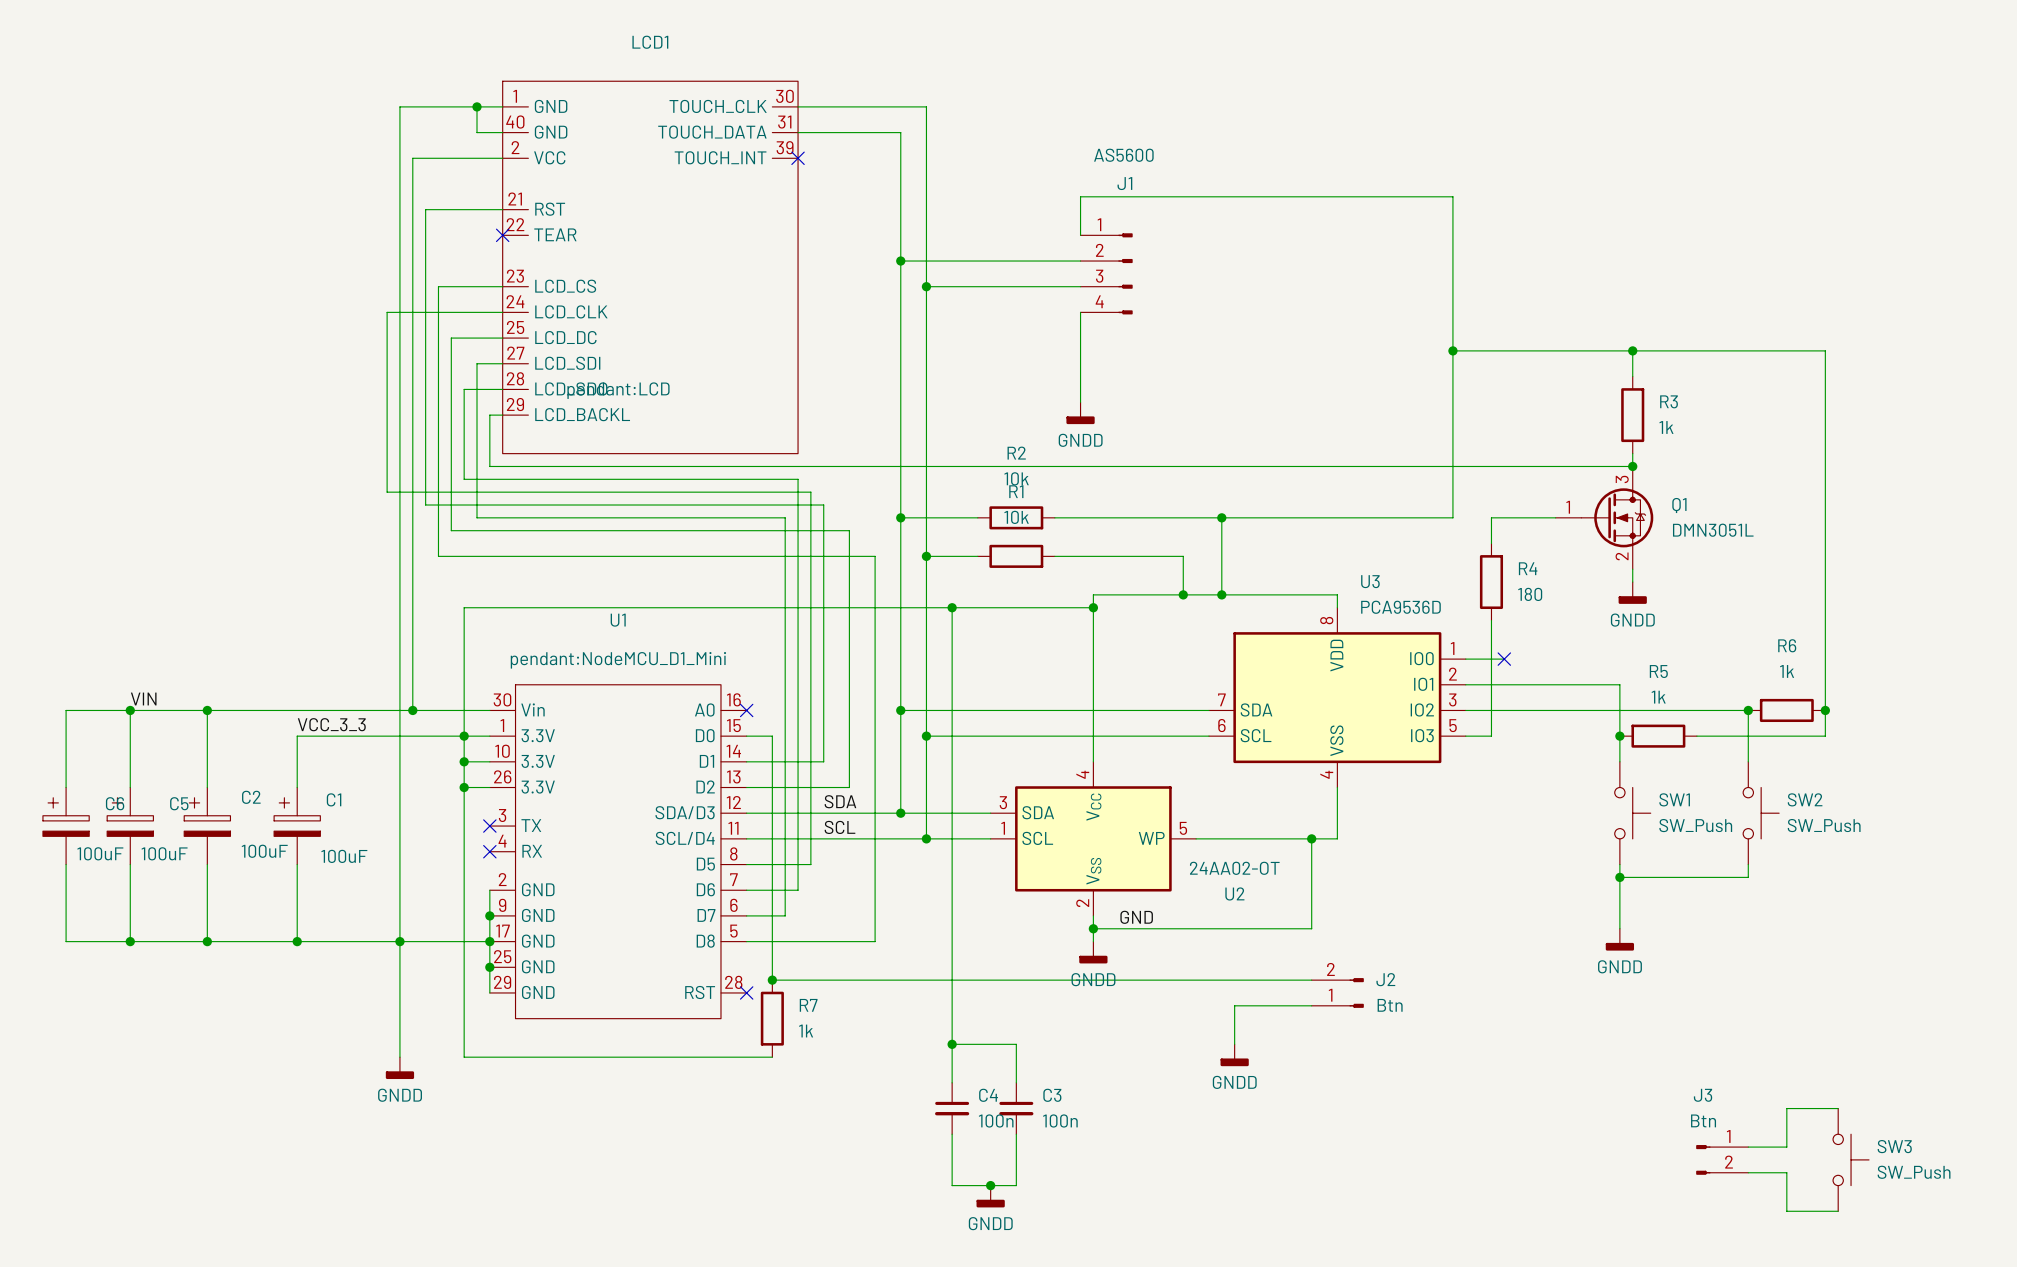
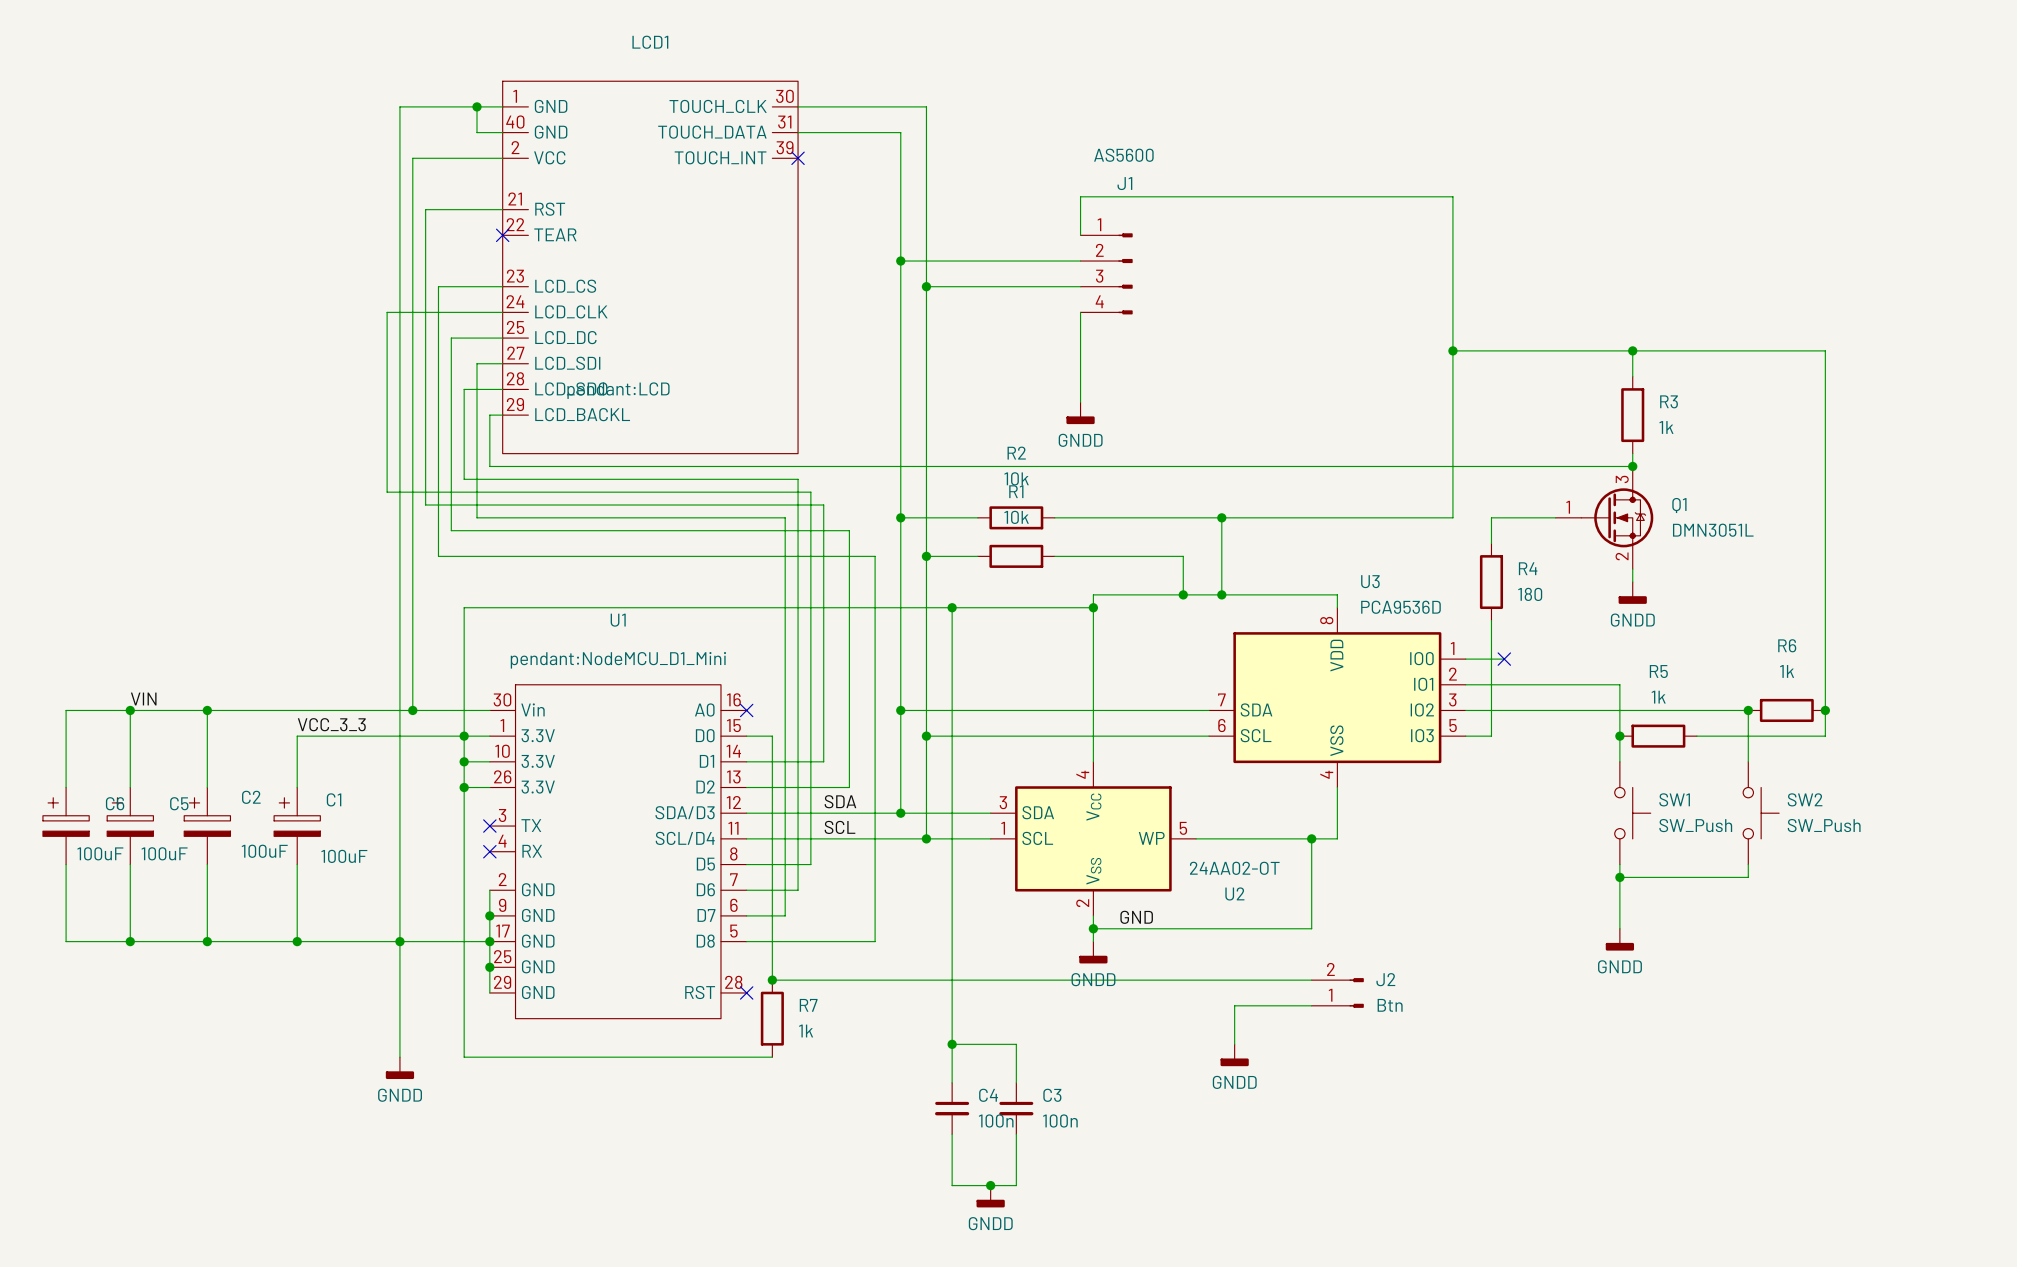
wire: (1838, 1108) (1786, 1108) (1786, 1147) (1748, 1147) -> none
J3: Btn (1722, 1159) -> none
SW3: SW_Push (1851, 1159) -> none
wire: (1748, 1172) (1786, 1172) (1786, 1211) (1838, 1211) -> none

